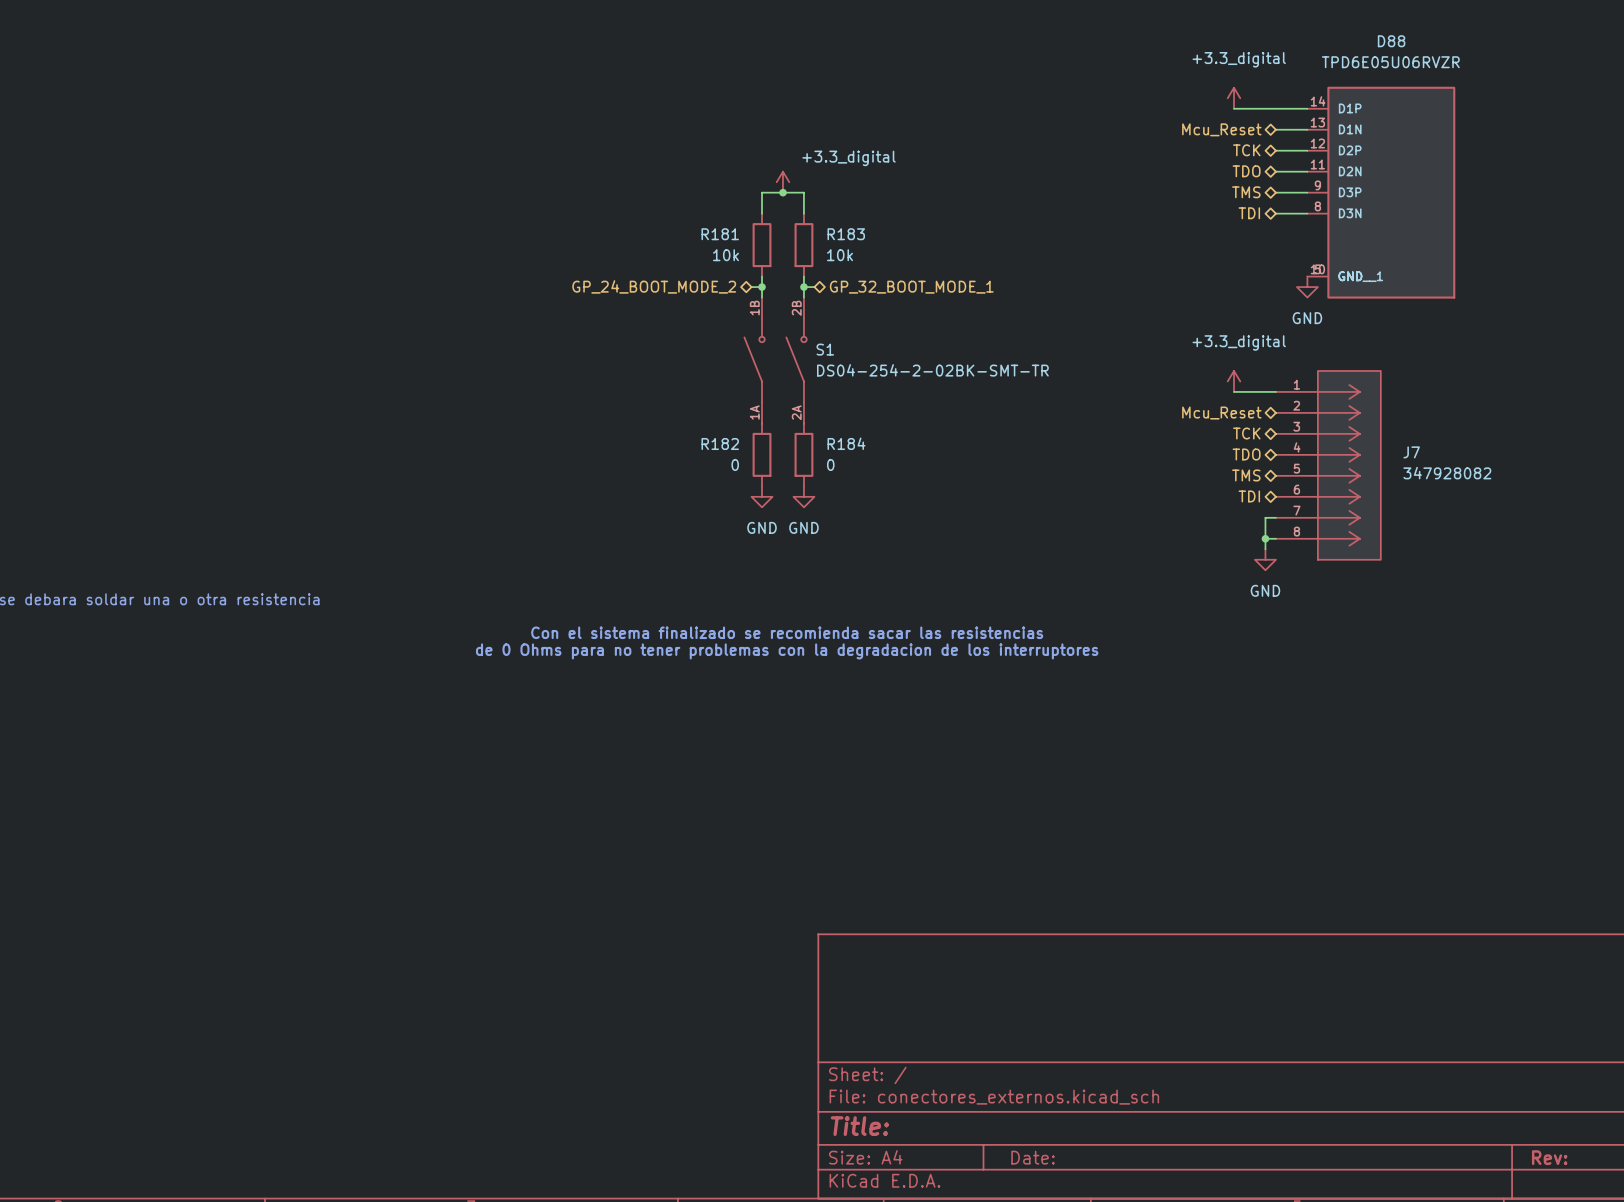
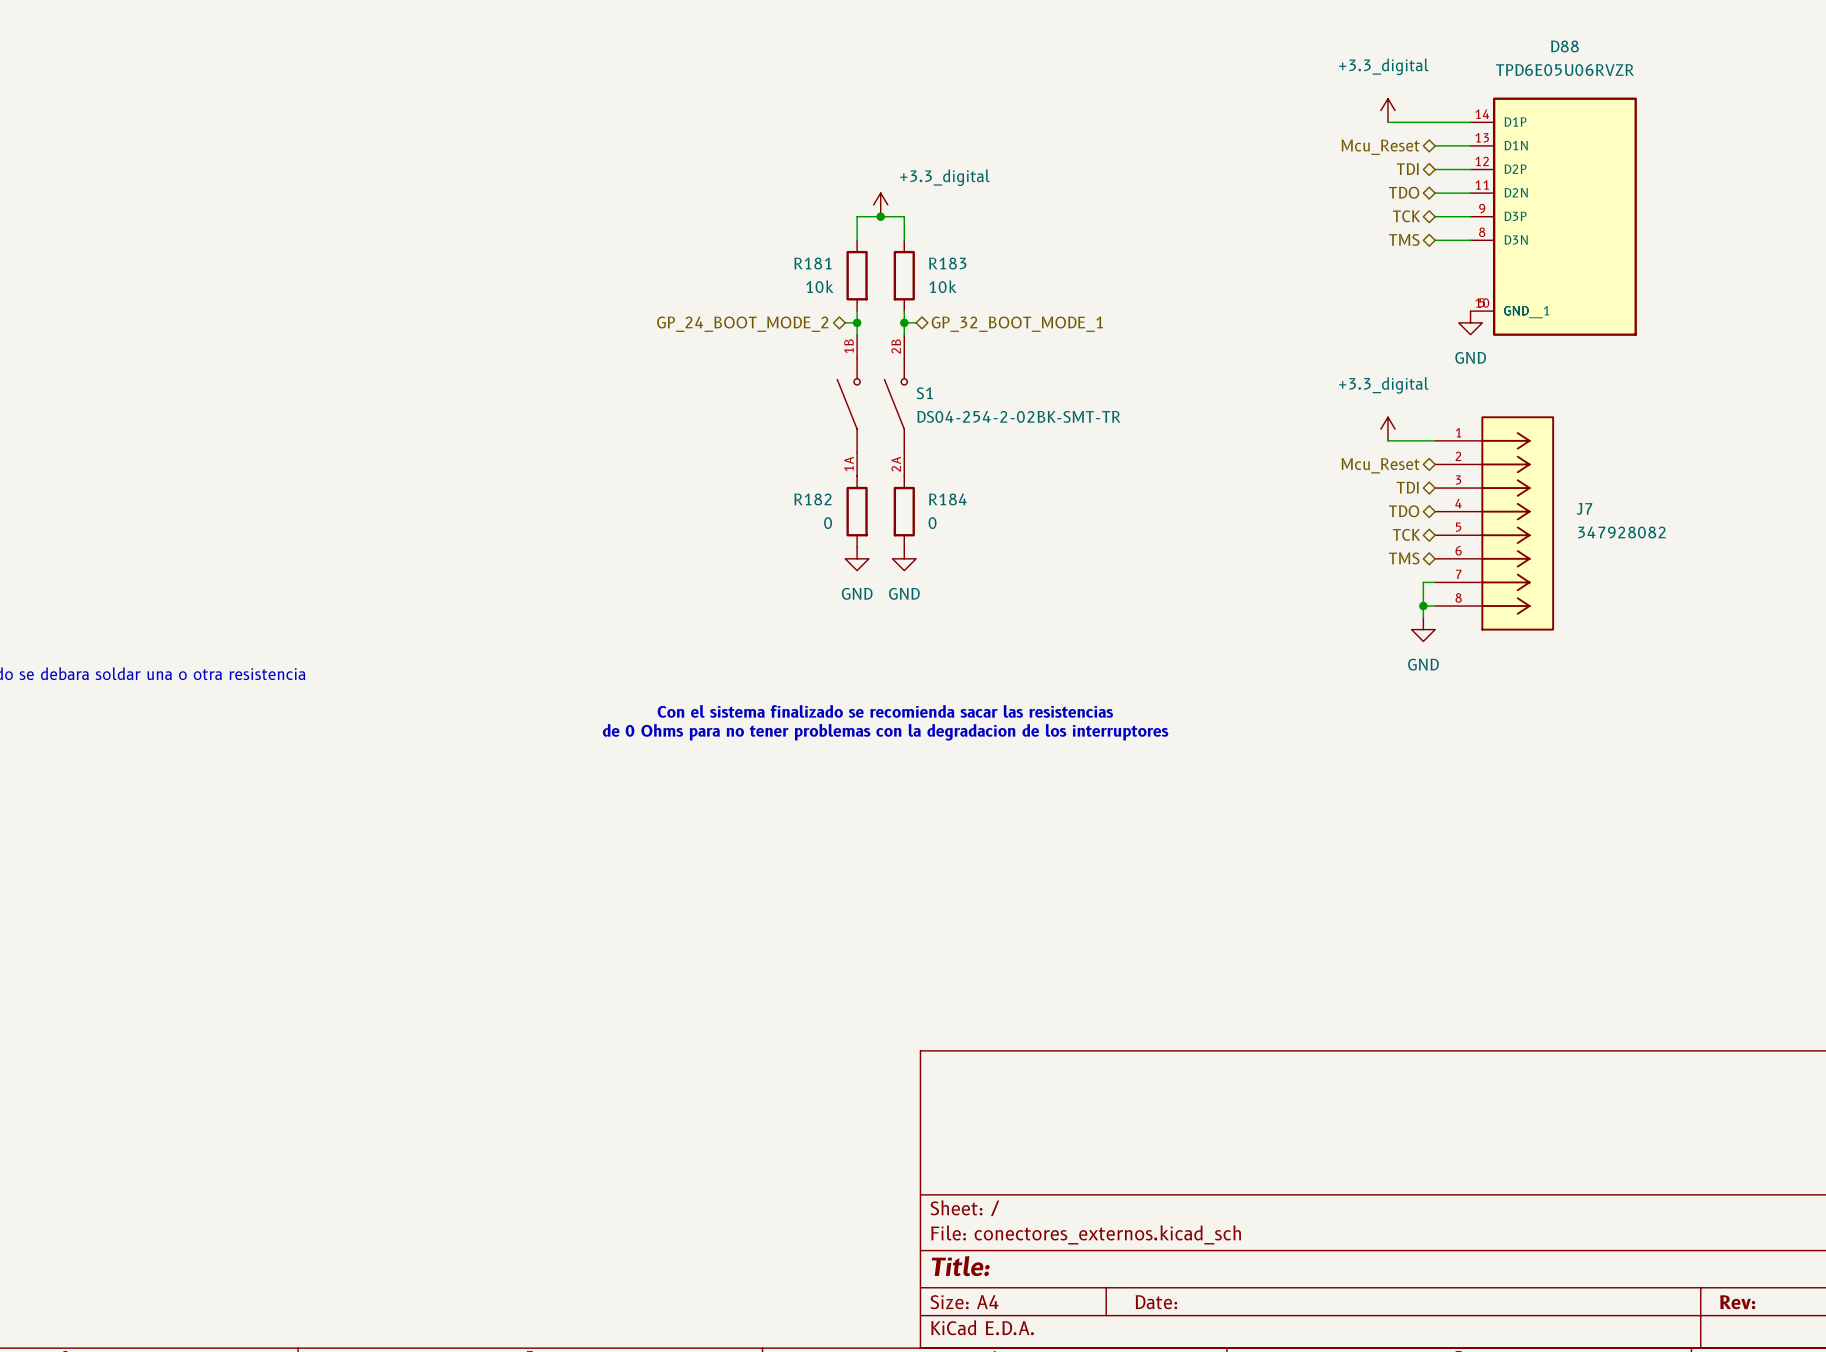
hierarchical label: TCK (1246, 150) -> TDI (1407, 169)
hierarchical label: TMS (1246, 192) -> TCK (1406, 216)
hierarchical label: TDI (1249, 213) -> TMS (1404, 239)
hierarchical label: TCK (1246, 433) -> TDI (1407, 487)
hierarchical label: TMS (1246, 475) -> TCK (1406, 534)
hierarchical label: TDI (1249, 496) -> TMS (1404, 558)

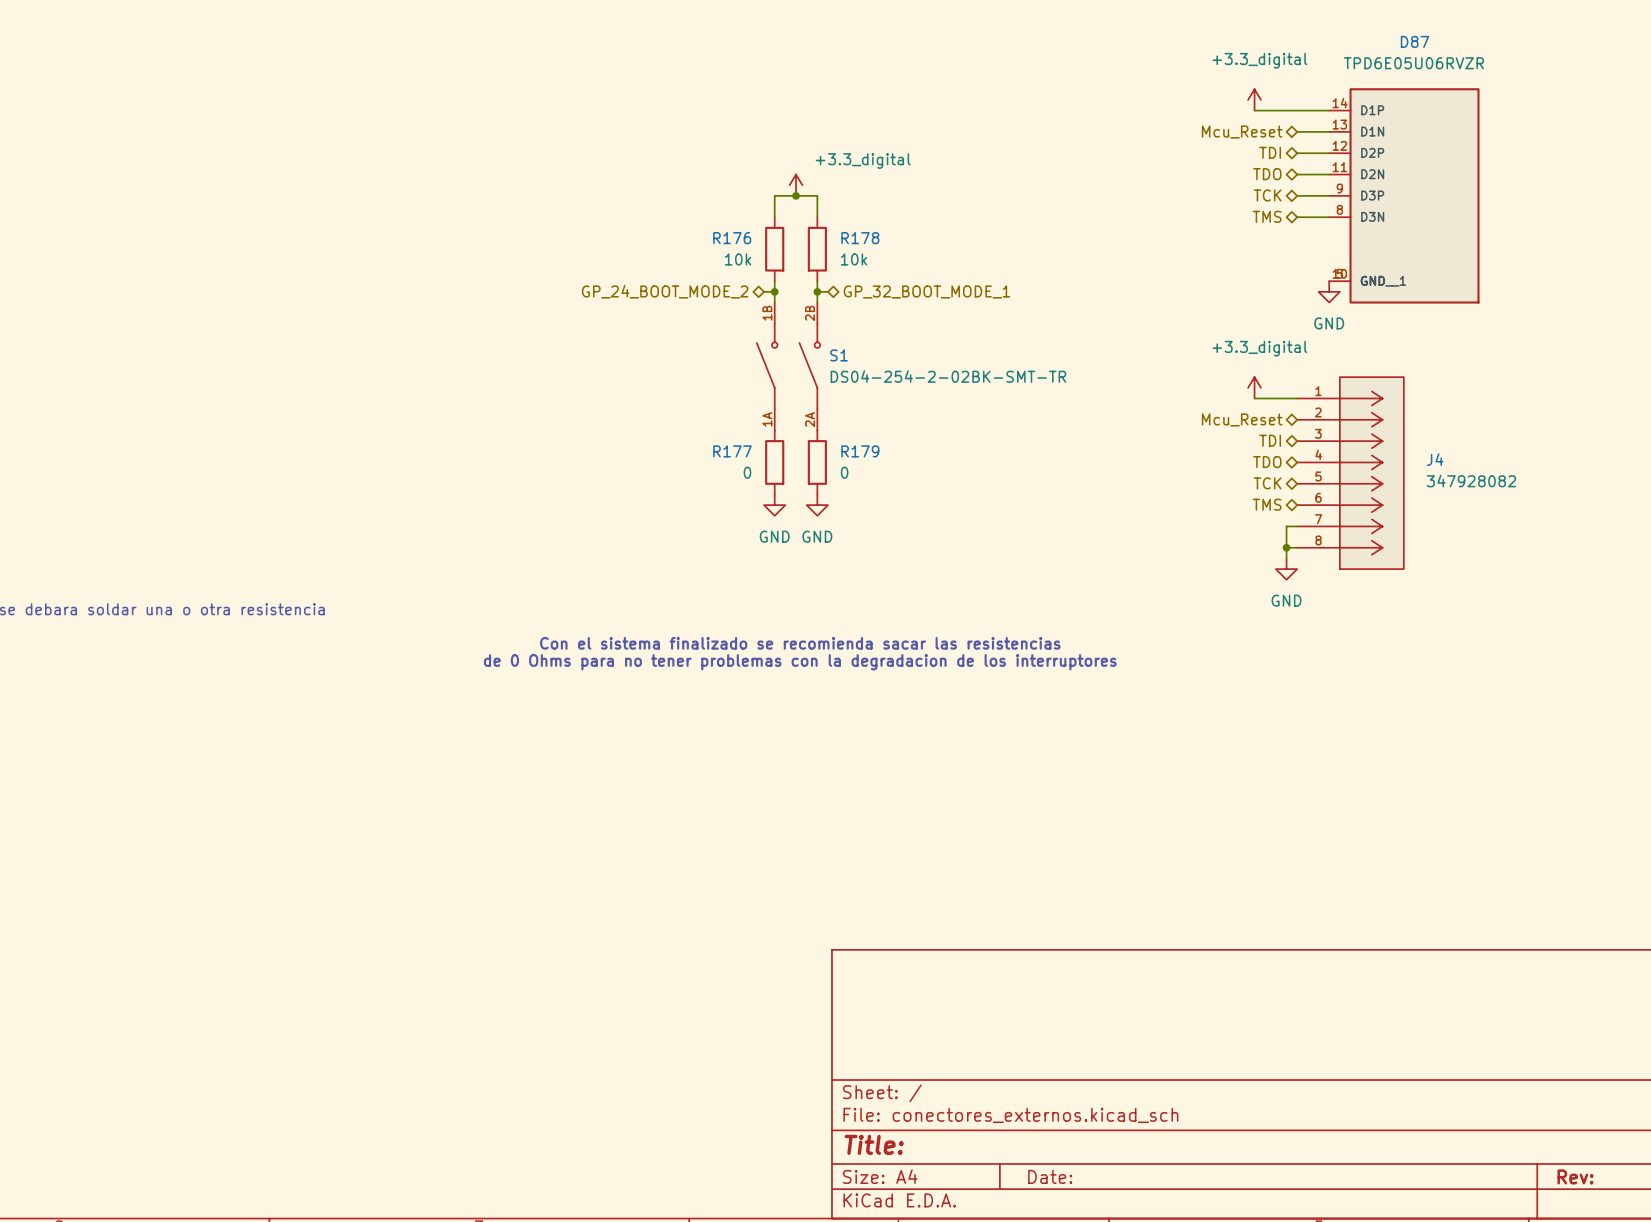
D88 name: D88 (1564, 46) -> D87 (1415, 41)
R181 name: R181 (812, 263) -> R176 (732, 238)
R183 name: R183 (947, 263) -> R178 (860, 238)
R182 name: R182 (812, 499) -> R177 (732, 451)
R184 name: R184 (947, 499) -> R179 (860, 451)
J7 name: J7 (1584, 508) -> J4 (1435, 459)

